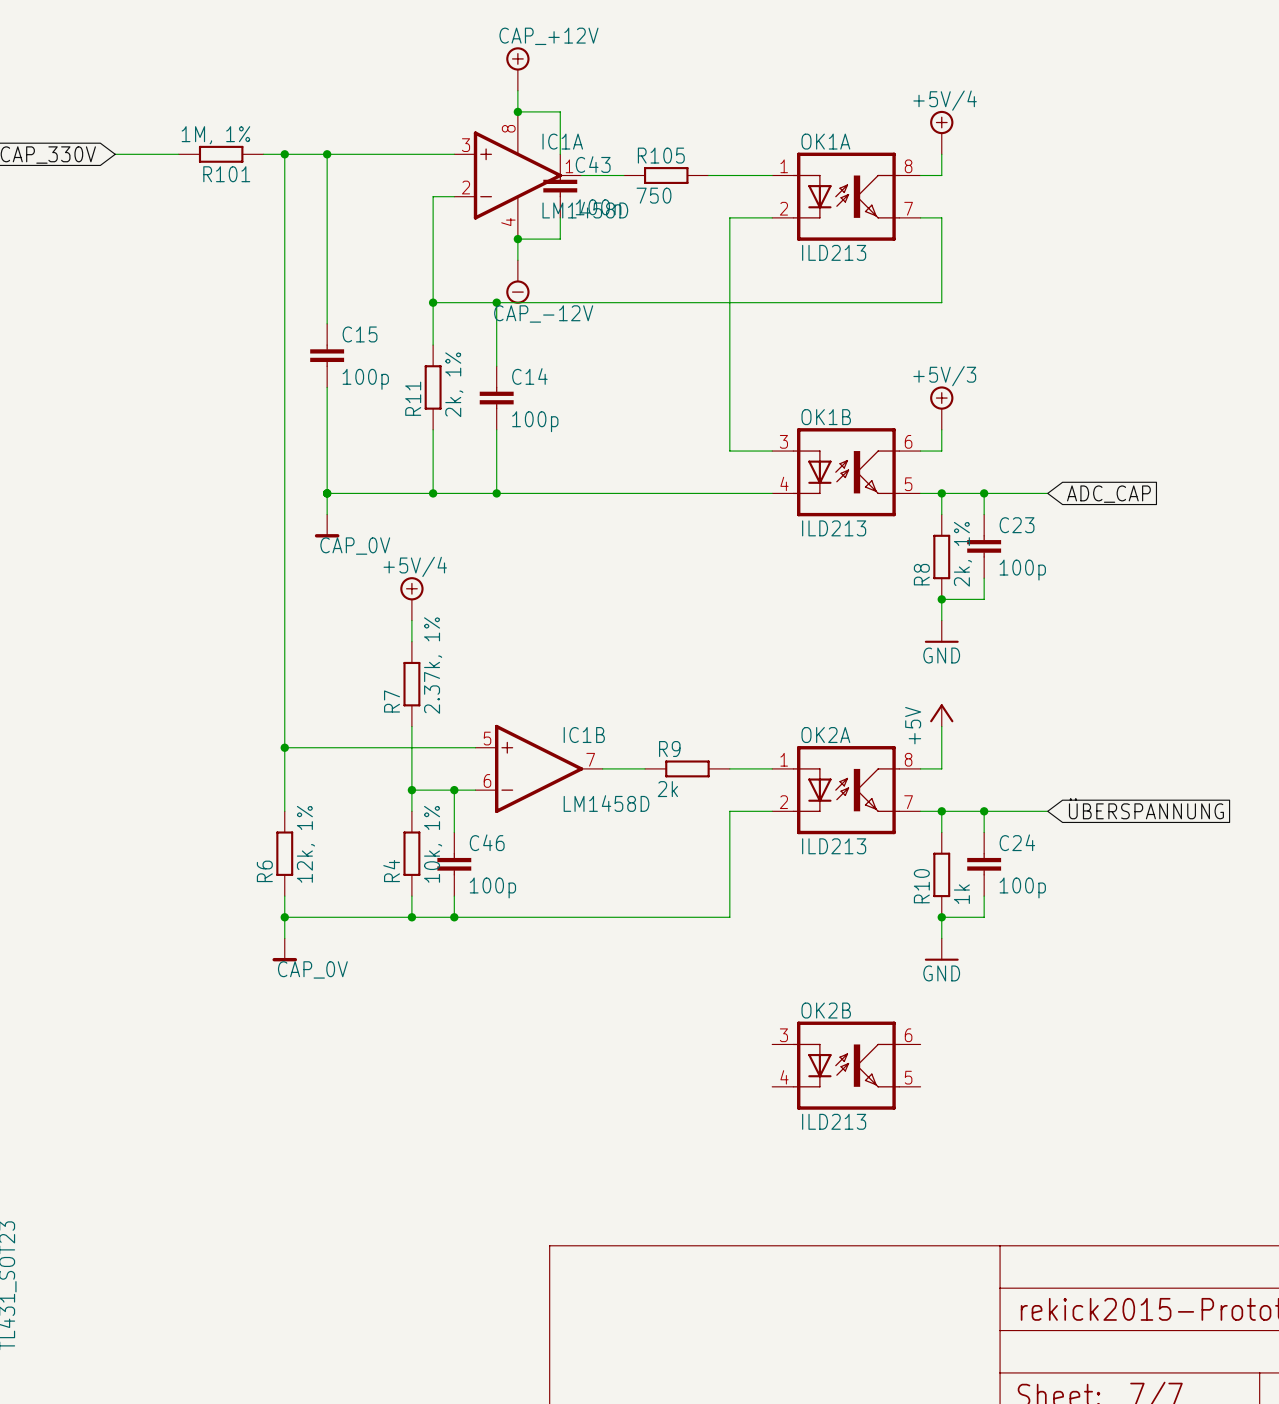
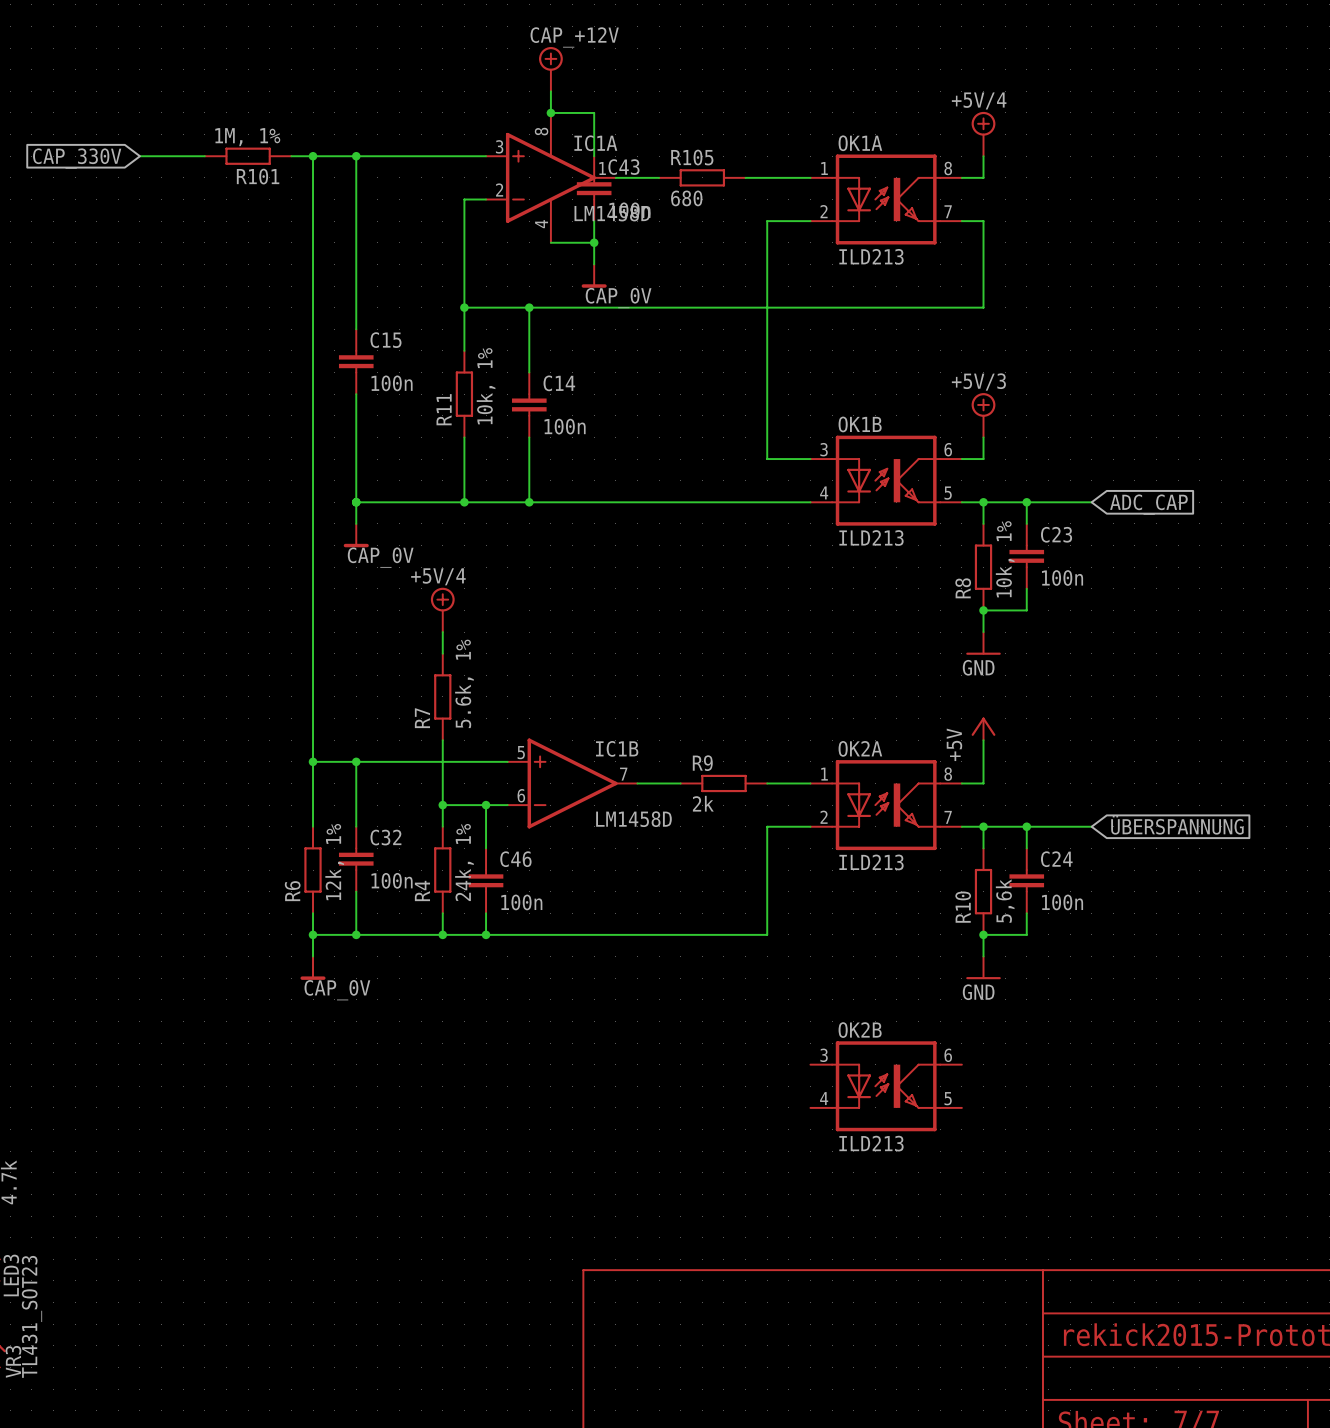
R105 value: 750 (653, 195) -> 680 (686, 198)
wire: (517, 239) (517, 260) -> (594, 242) (594, 264)
junction position: (517, 239) -> (594, 242)
power symbol: none -> CAP_0V (594, 276)
power symbol: CAP_-12V (517, 282) -> none
C15 value: 100p (365, 379) -> 100n (392, 383)
R11 value: 2k, 1% (454, 384) -> 10k, 1% (486, 386)
C14 value: 100p (535, 421) -> 100n (565, 426)
R8 value: 2k, 1% (962, 554) -> 10k, 1% (1005, 559)
C23 value: 100p (1022, 570) -> 100n (1062, 578)
R7 value: 2.37k, 1% (433, 665) -> 5.6k, 1% (464, 683)
wire: none -> (356, 761) (356, 826)
junction: none -> (356, 761)
C32: none -> 100n (356, 859)
R4 value: 10k, 1% (433, 844) -> 24k, 1% (464, 862)
wire: none -> (356, 891) (356, 934)
C46 value: 100p (492, 887) -> 100n (521, 902)
C24 value: 100p (1022, 887) -> 100n (1062, 902)
R10 value: 1k (961, 894) -> 5,6k (1005, 901)
junction: none -> (356, 934)

